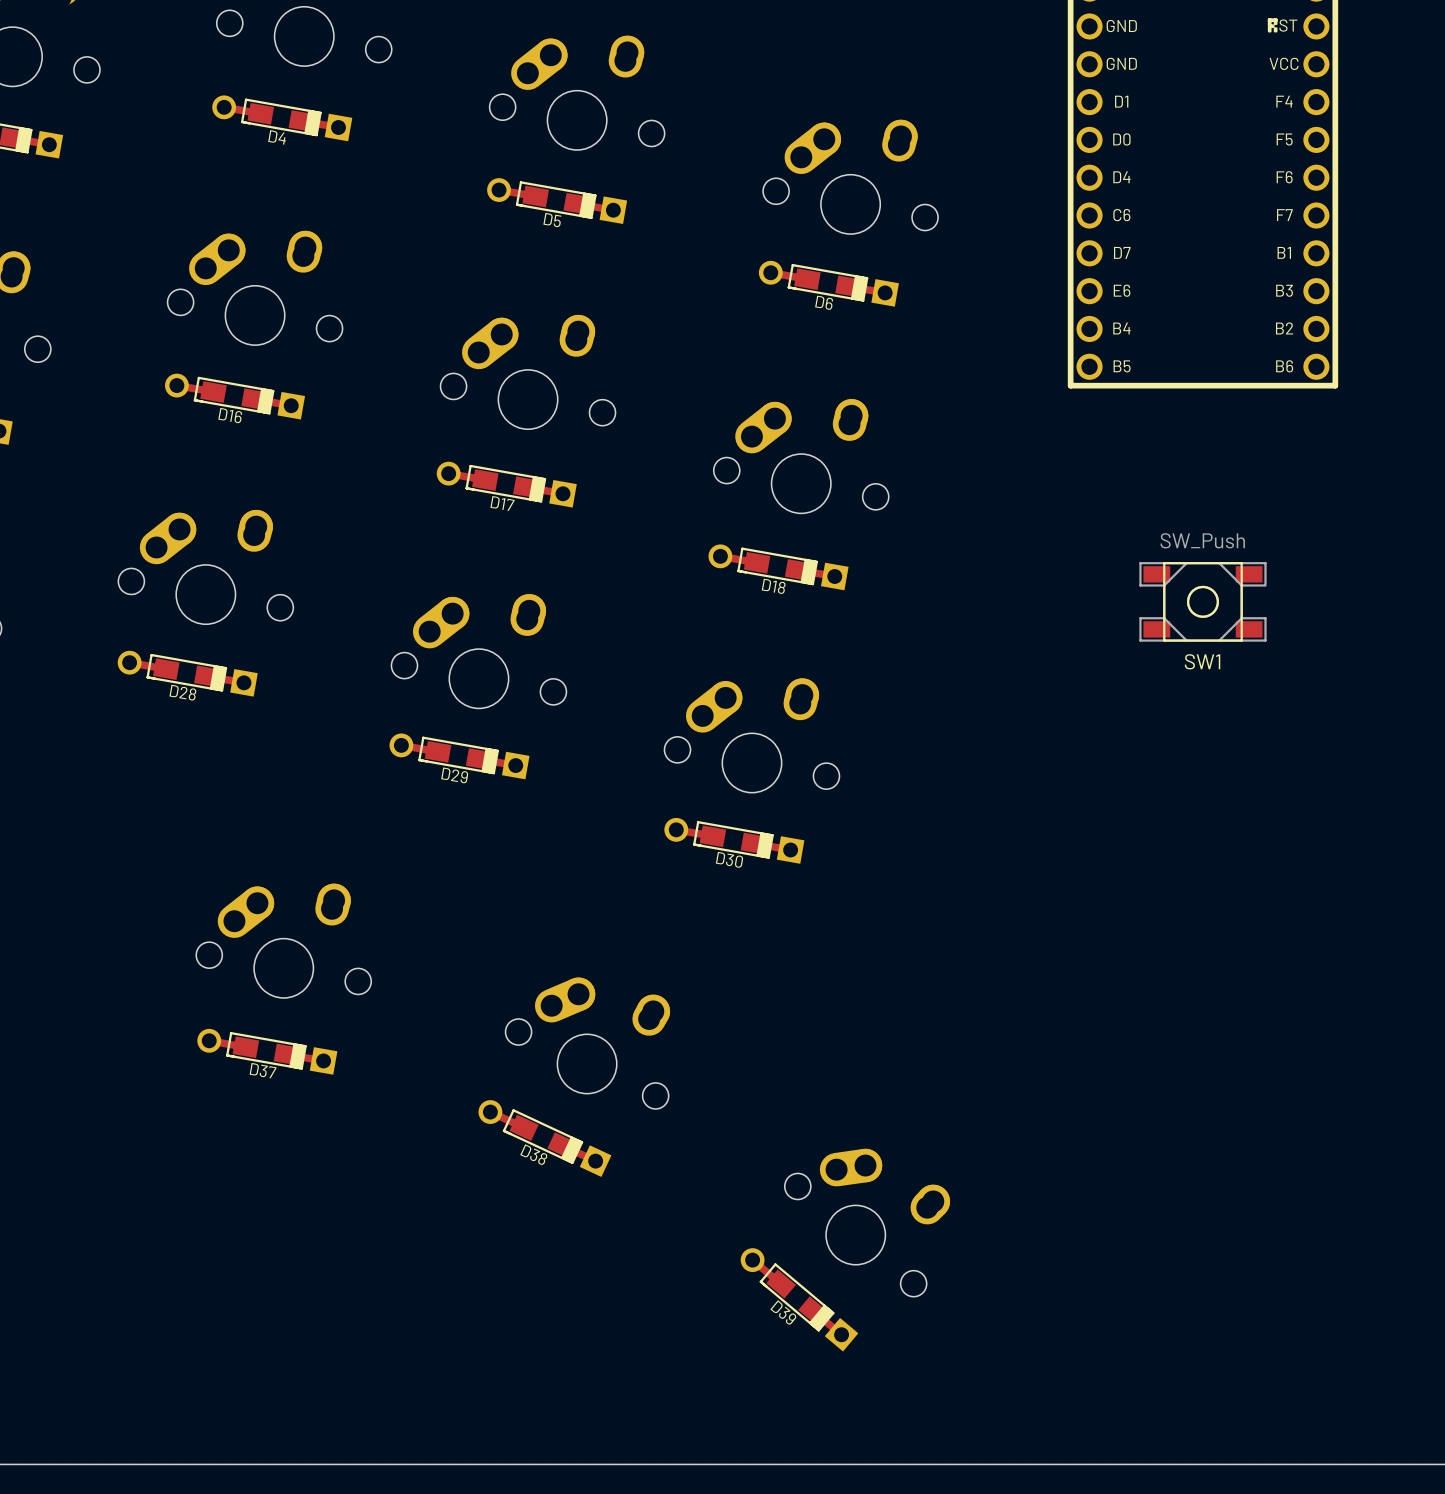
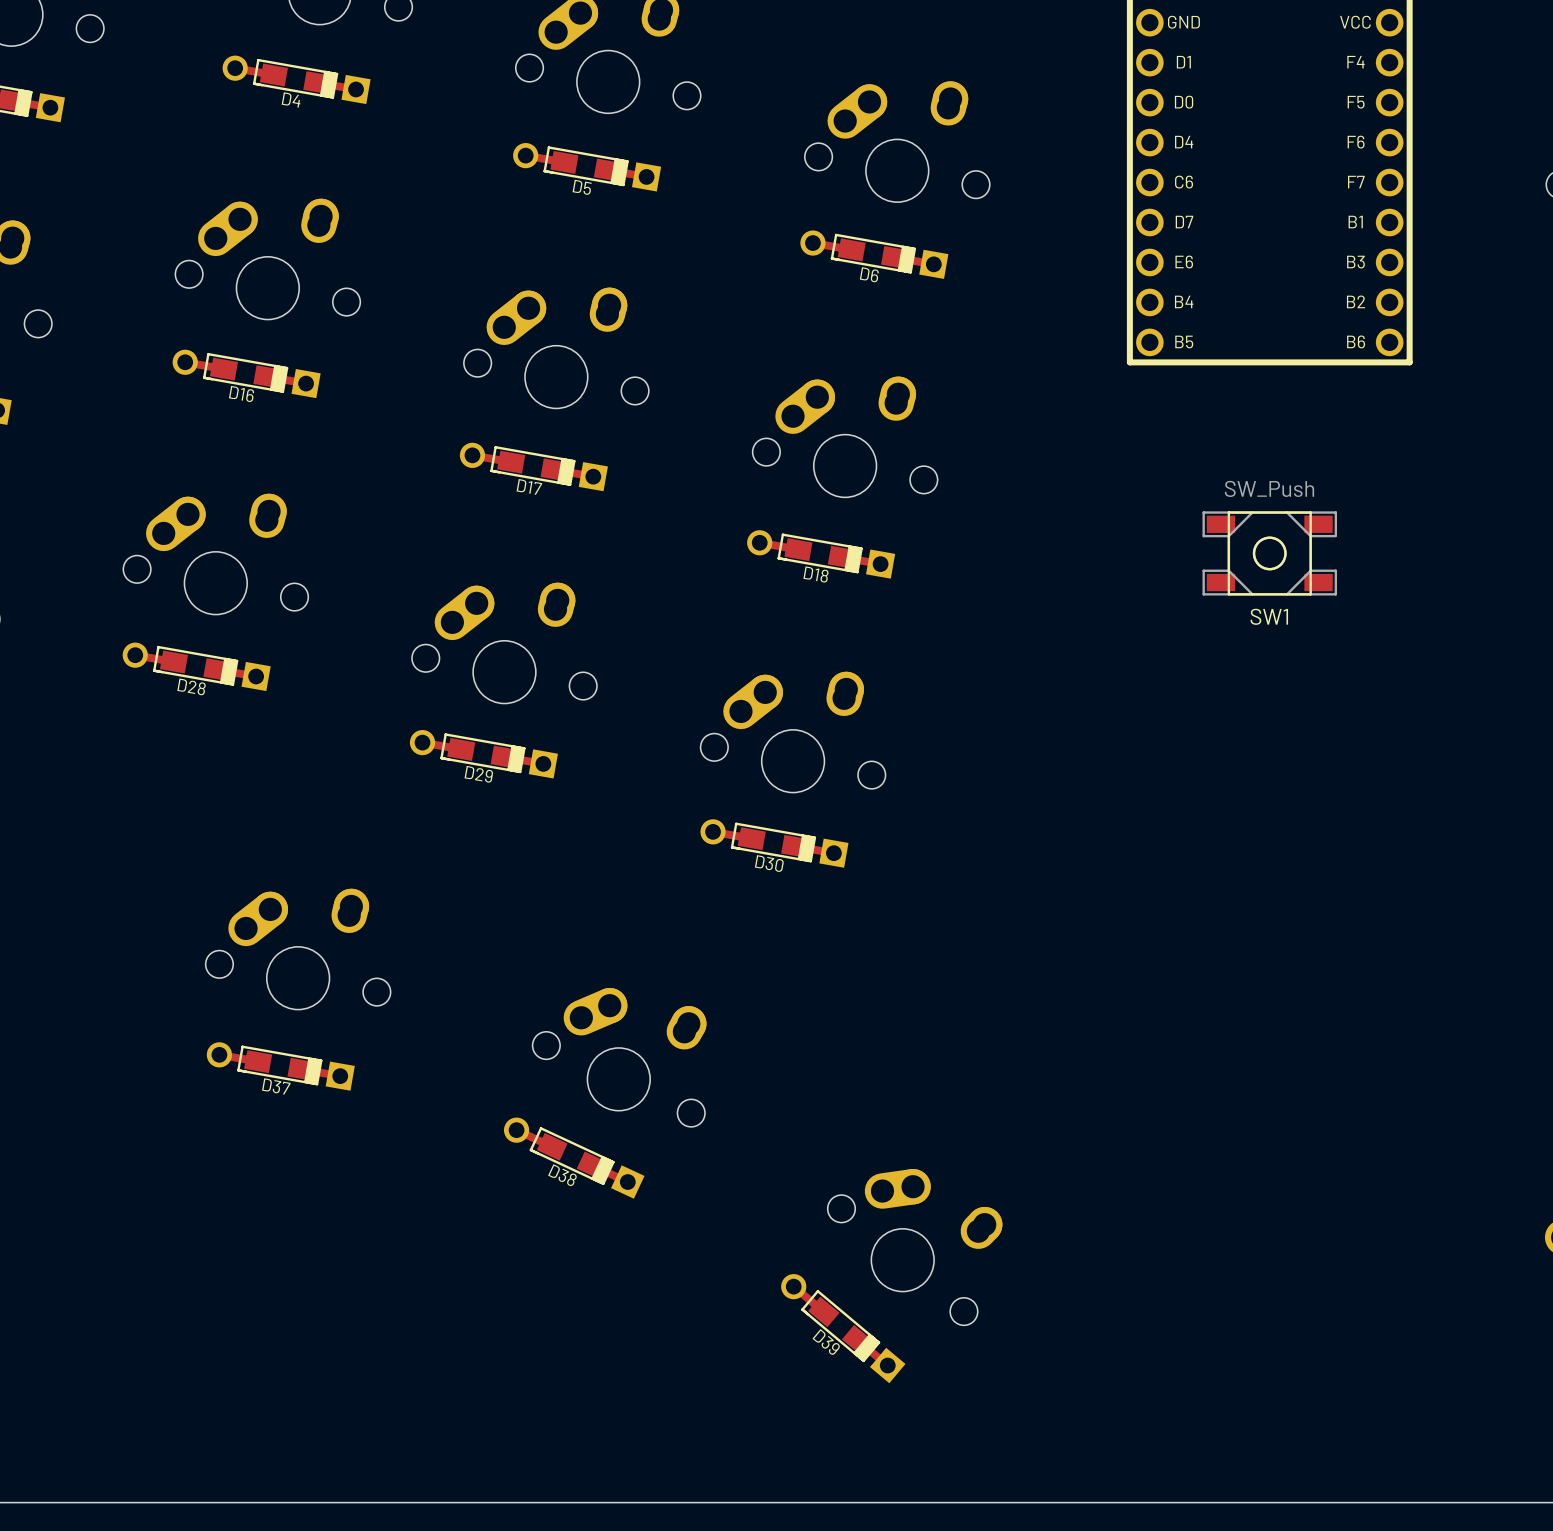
SW1 position: (1202, 601) -> (1269, 553)

